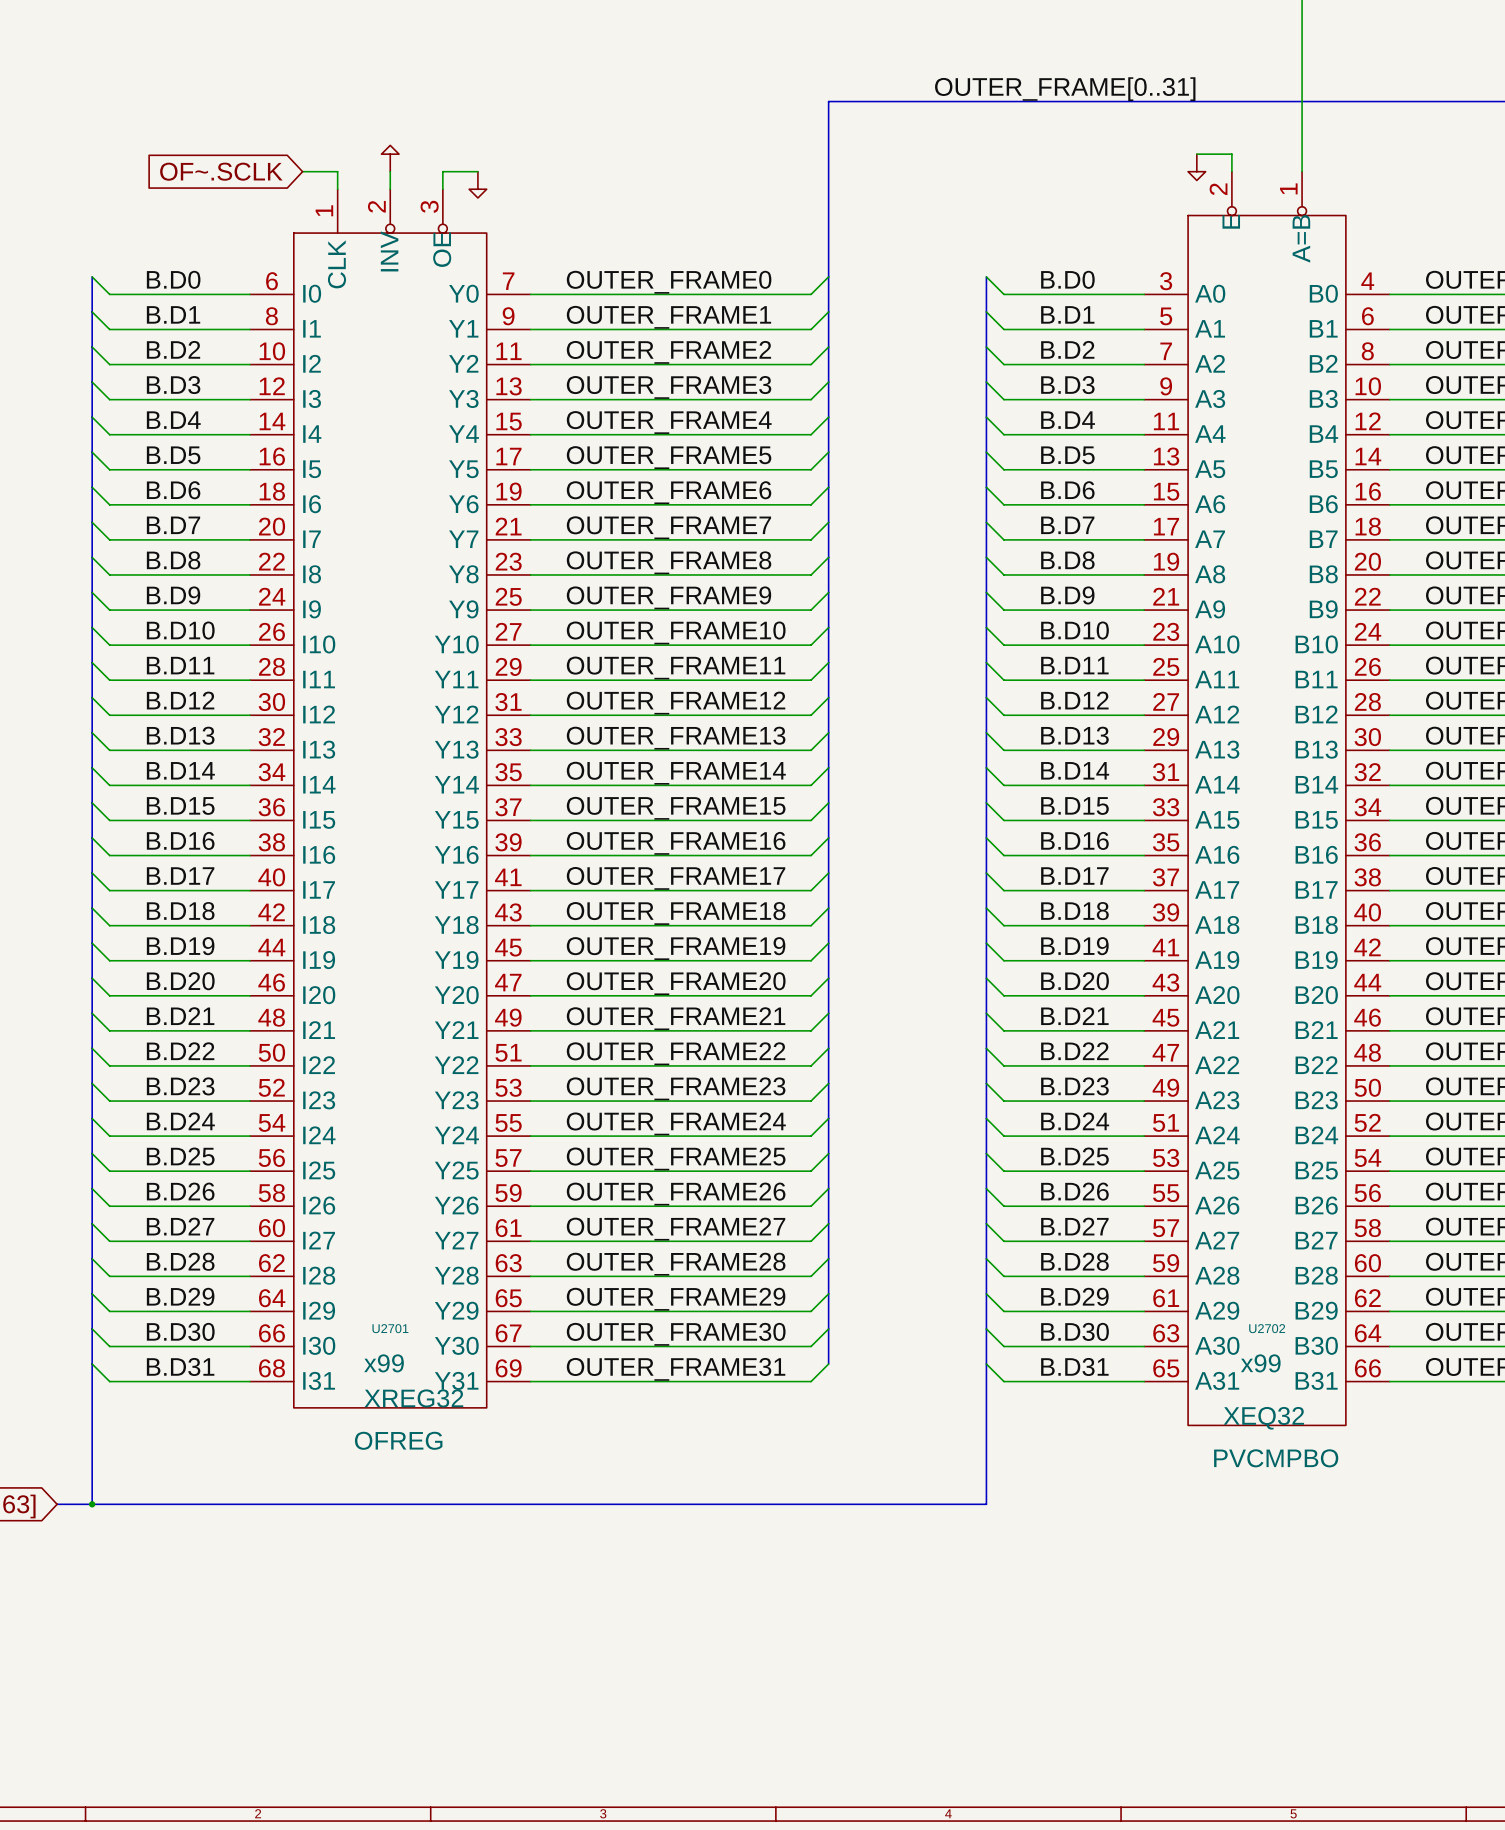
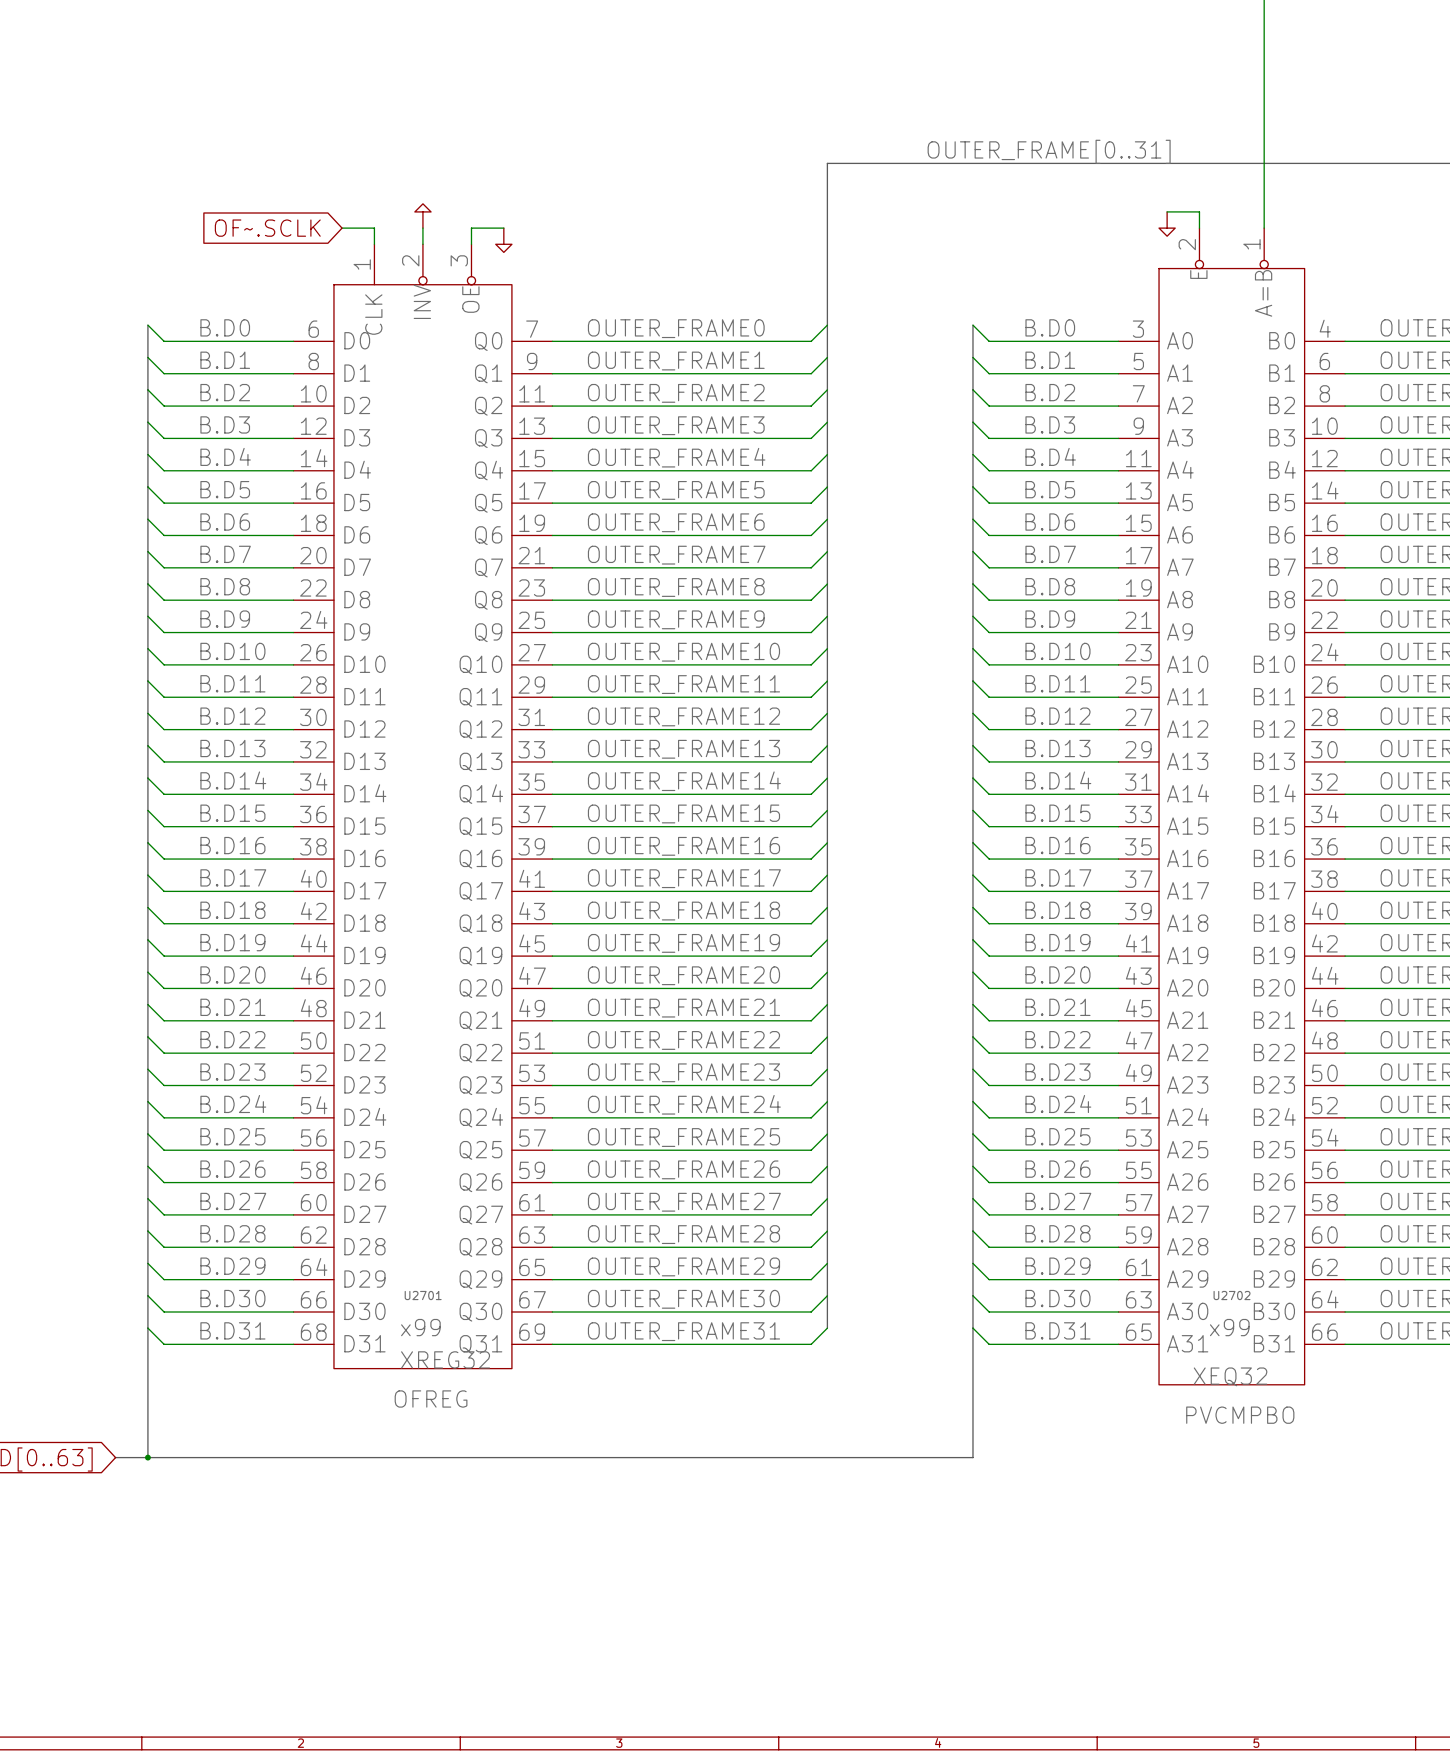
U2701 symbol: [249, 189, 531, 1408] -> [293, 244, 553, 1369]

